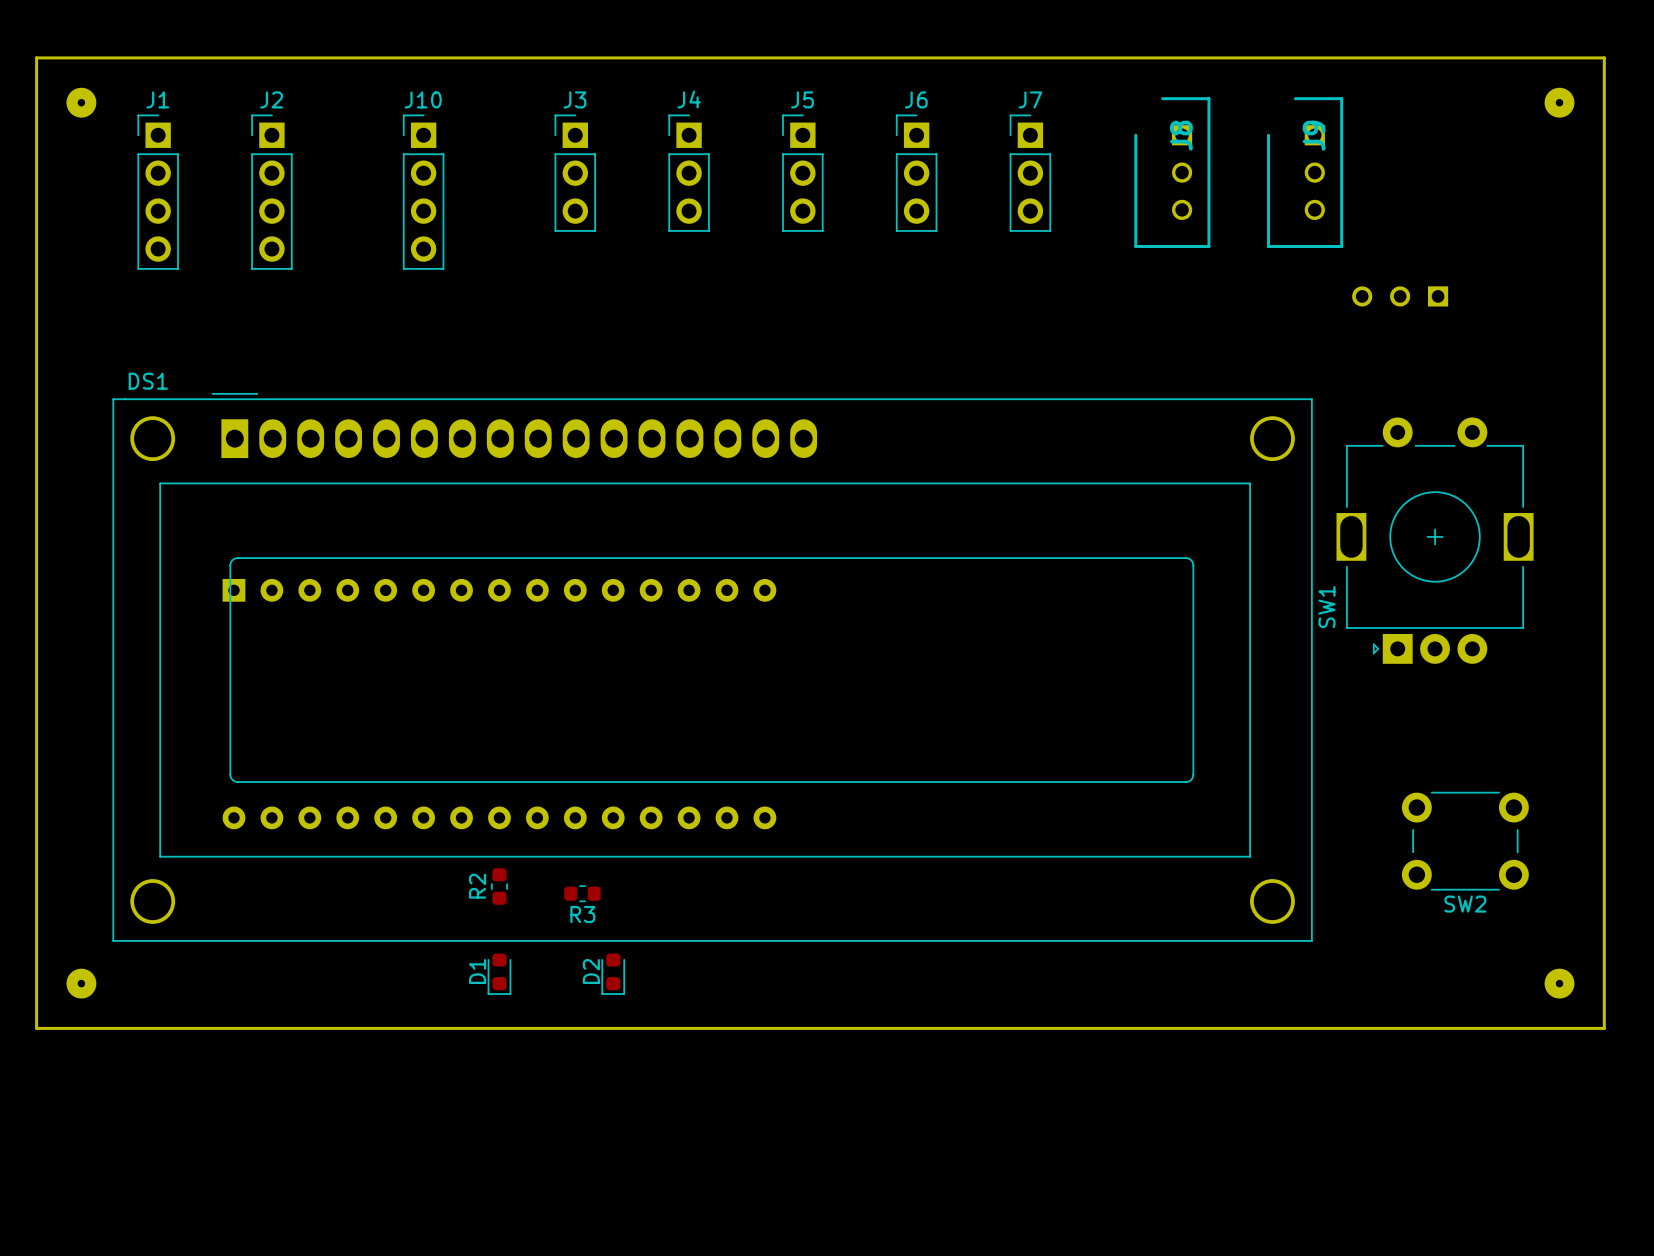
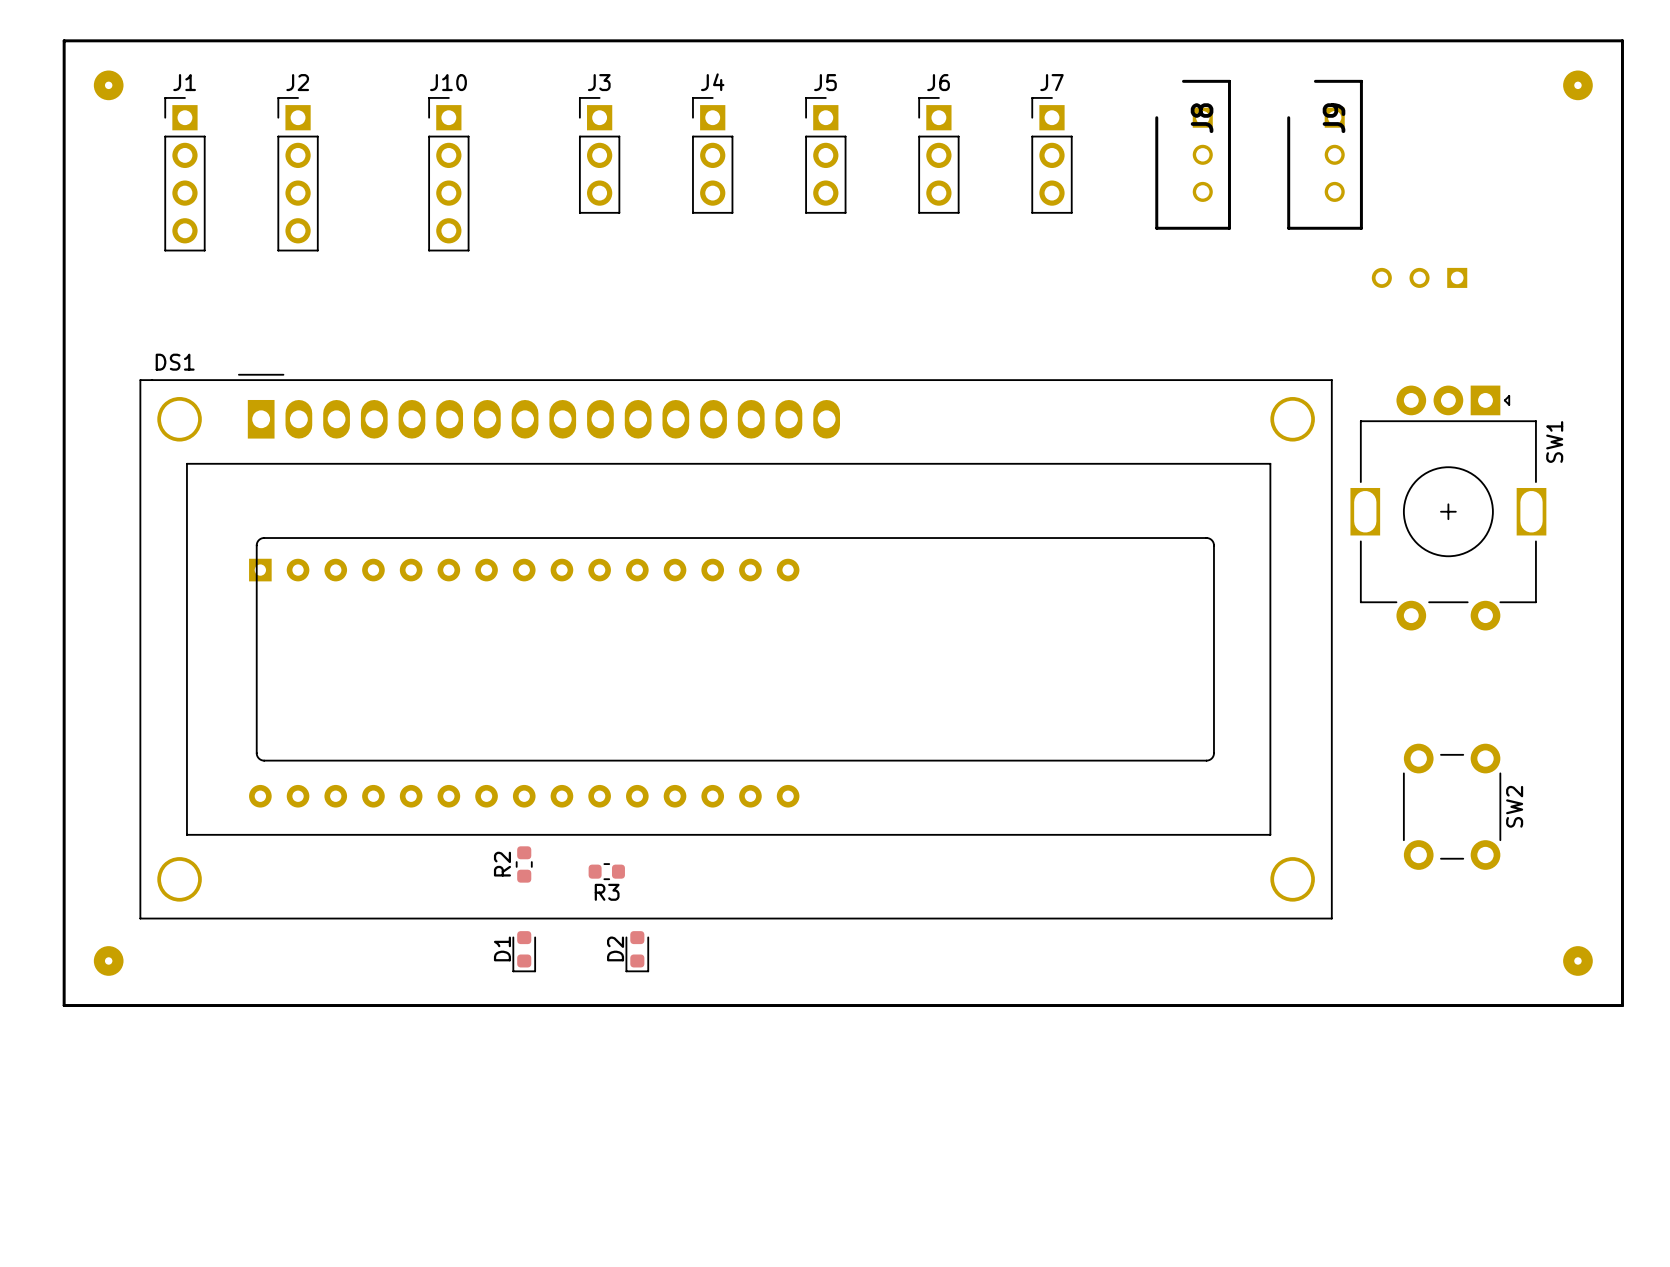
SW1 rotation: 0° (1435, 540) -> 180° (1448, 508)
SW2 rotation: 0° (1465, 841) -> 90° clockwise (1452, 806)
SW2 name position: SW2 (1465, 904) -> SW2 (1514, 806)

